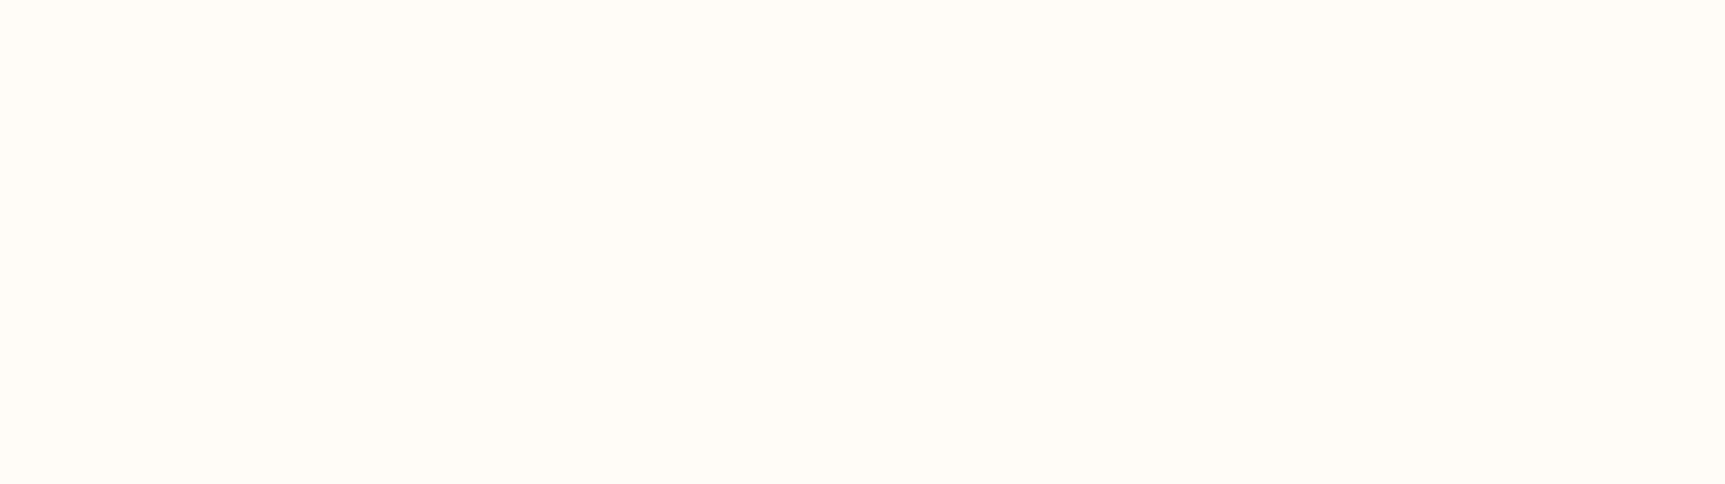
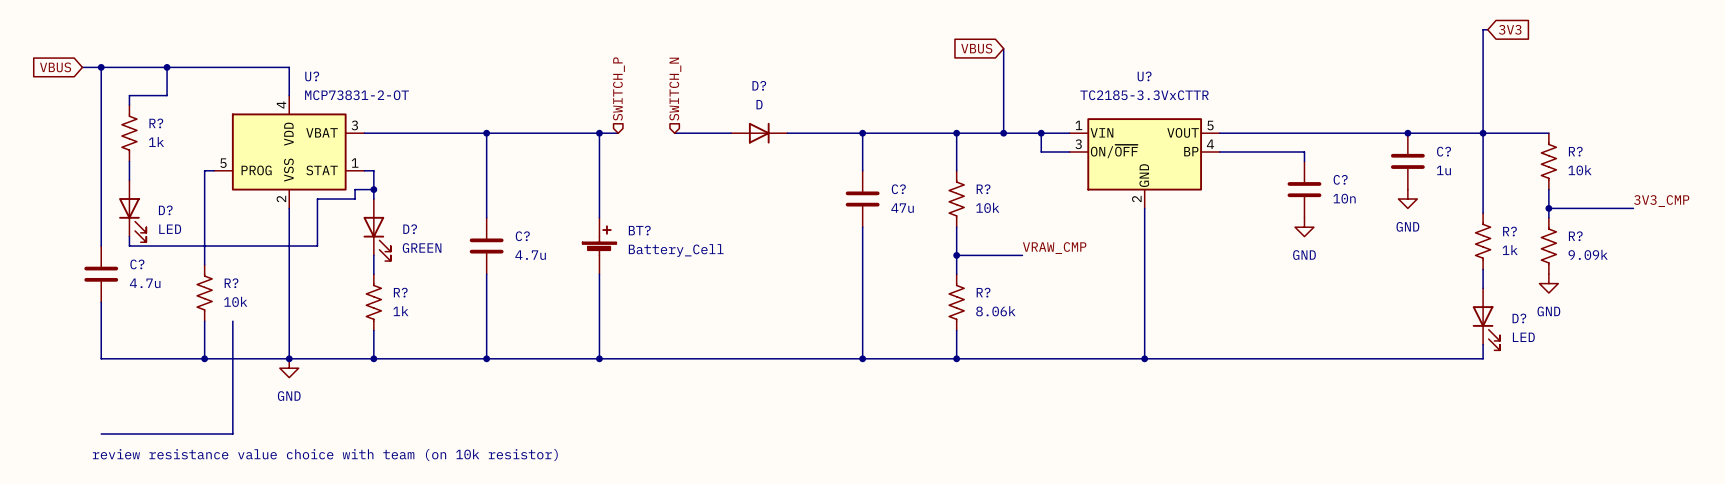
wire: none -> (1487, 29) (1483, 29) (1483, 213)
global label: none -> 3V3 (1510, 29)
global label: none -> VBUS (976, 48)
wire: none -> (1003, 48) (1003, 133)
global label: none -> VBUS (55, 67)
wire: none -> (82, 67) (289, 67) (289, 95)
wire: none -> (101, 67) (101, 246)
junction: none -> (101, 67)
wire: none -> (167, 67) (167, 95) (129, 95) (129, 105)
junction: none -> (167, 67)
hierarchical label: none -> SWITCH_P (618, 89)
hierarchical label: none -> SWITCH_N (675, 89)
R?: none -> 1k (129, 133)
wire: none -> (364, 133) (618, 133)
wire: none -> (486, 133) (486, 217)
junction: none -> (486, 133)
wire: none -> (599, 133) (599, 217)
junction: none -> (599, 133)
wire: none -> (674, 133) (731, 133)
D?: none -> D (759, 133)
wire: none -> (787, 133) (1069, 133)
wire: none -> (862, 133) (862, 170)
junction: none -> (862, 133)
wire: none -> (956, 133) (956, 170)
junction: none -> (956, 133)
junction: none -> (1003, 133)
wire: none -> (1041, 133) (1041, 152) (1069, 152)
junction: none -> (1041, 133)
wire: none -> (1219, 133) (1548, 133)
junction: none -> (1407, 133)
junction: none -> (1483, 133)
U?: none -> MCP73831-2-OT (289, 152)
wire: none -> (1219, 152) (1304, 152) (1304, 161)
wire: none -> (129, 161) (129, 180)
C?: none -> 1u (1407, 161)
R?: none -> 10k (1548, 161)
U?: none -> TC2185-3.3VxCTTR (1144, 163)
wire: none -> (214, 170) (204, 170) (204, 264)
wire: none -> (364, 170) (373, 170) (373, 199)
wire: none -> (373, 189) (355, 189) (355, 199) (317, 199) (317, 246) (129, 246) (129, 236)
junction: none -> (373, 189)
C?: none -> 10n (1304, 189)
wire: none -> (1548, 189) (1548, 217)
C?: none -> 47u (862, 199)
R?: none -> 10k (956, 199)
power symbol: none -> GND (1407, 199)
label: none -> 3V3_CMP (1661, 201)
wire: none -> (289, 208) (289, 358)
wire: none -> (1144, 208) (1144, 358)
wire: none -> (1548, 208) (1633, 208)
junction: none -> (1548, 208)
D?: none -> LED (132, 211)
wire: none -> (862, 227) (862, 358)
wire: none -> (956, 227) (956, 274)
power symbol: none -> GND (1304, 227)
D?: none -> GREEN (377, 230)
R?: none -> 1k (1483, 241)
C?: none -> 4.7u (486, 246)
BT?: none -> Battery_Cell (599, 246)
R?: none -> 9.09k (1548, 246)
label: none -> VRAW_CMP (1054, 248)
wire: none -> (373, 255) (373, 274)
wire: none -> (956, 255) (1022, 255)
junction: none -> (956, 255)
wire: none -> (1483, 269) (1483, 288)
C?: none -> 4.7u (101, 274)
wire: none -> (486, 274) (486, 358)
wire: none -> (599, 274) (599, 358)
power symbol: none -> GND (1548, 283)
R?: none -> 10k (204, 293)
wire: none -> (101, 302) (101, 358) (1483, 358) (1483, 344)
R?: none -> 1k (373, 302)
R?: none -> 8.06k (956, 302)
D?: none -> LED (1486, 319)
wire: none -> (204, 321) (204, 358)
line: none -> (232, 321) (232, 434) (101, 434)
wire: none -> (373, 330) (373, 358)
wire: none -> (956, 330) (956, 358)
junction: none -> (204, 358)
junction: none -> (289, 358)
junction: none -> (373, 358)
junction: none -> (486, 358)
junction: none -> (599, 358)
junction: none -> (862, 358)
junction: none -> (956, 358)
junction: none -> (1144, 358)
power symbol: none -> GND (289, 368)
text: none -> review resistance value choice with team (on 10k resistor) (325, 455)

